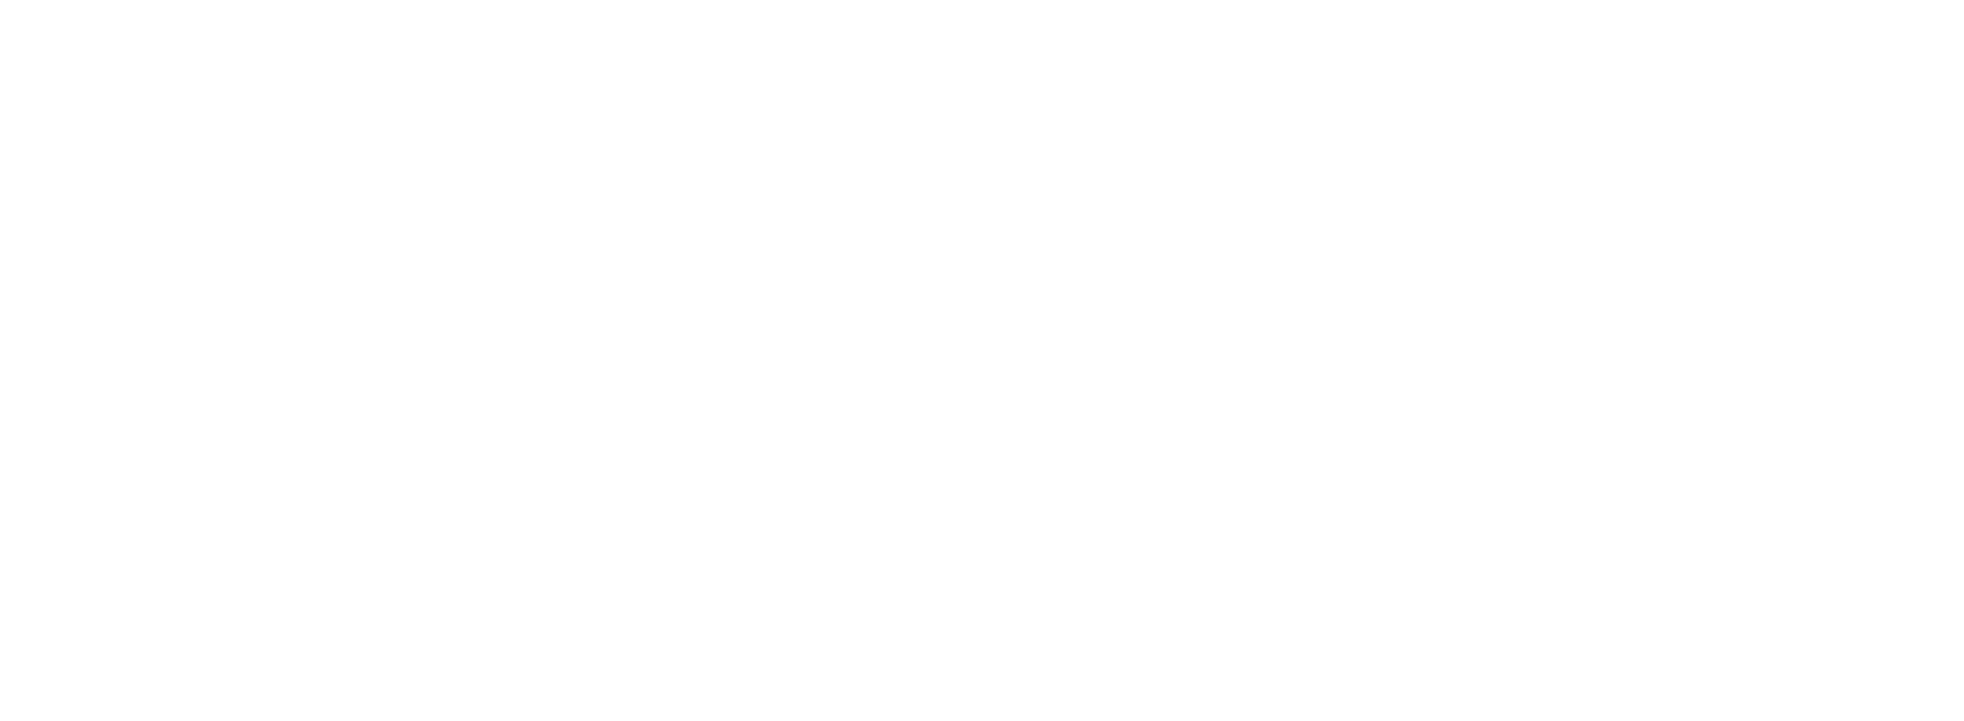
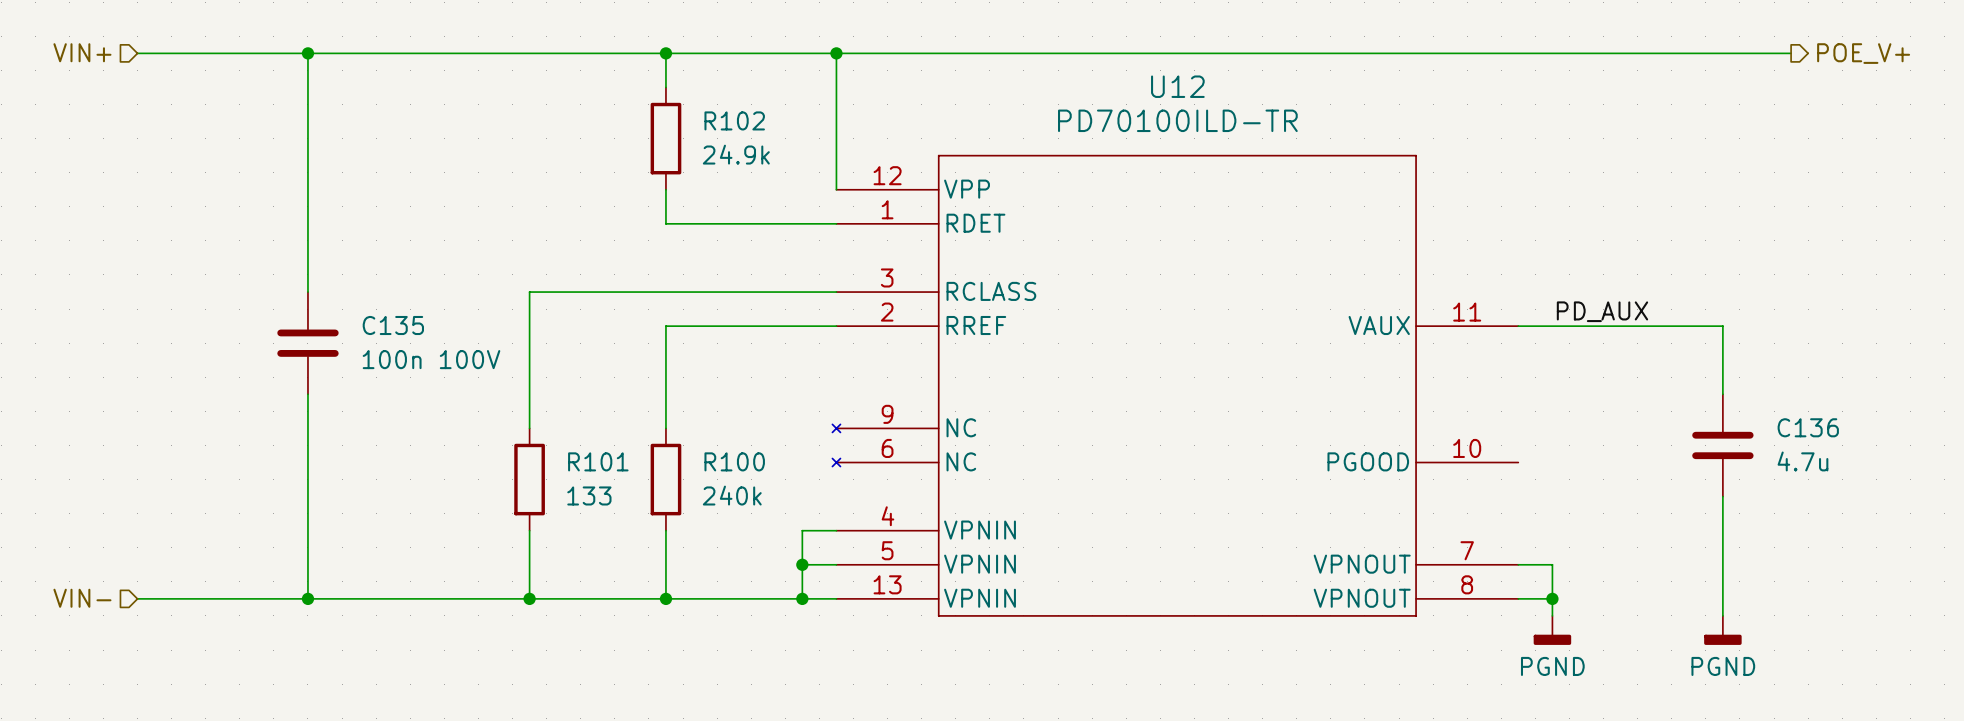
hierarchical label: none -> VIN+ (82, 52)
wire: none -> (137, 53) (1791, 53)
wire: none -> (307, 53) (307, 292)
junction: none -> (307, 53)
wire: none -> (665, 53) (665, 87)
junction: none -> (665, 53)
wire: none -> (836, 53) (836, 189)
junction: none -> (836, 53)
hierarchical label: none -> POE_V+ (1863, 53)
R102: none -> 24.9k (665, 138)
wire: none -> (665, 189) (665, 223) (836, 223)
wire: none -> (836, 292) (529, 292) (529, 428)
label: none -> PD_AUX (1602, 311)
wire: none -> (836, 326) (665, 326) (665, 428)
wire: none -> (1518, 326) (1722, 326) (1722, 394)
C135: none -> 100n 100V (307, 343)
U12: none -> PD70100ILD-TR (1175, 385)
wire: none -> (307, 394) (307, 598)
C136: none -> 4.7u (1722, 445)
R101: none -> 133 (529, 479)
R100: none -> 240k (665, 479)
wire: none -> (1722, 496) (1722, 615)
wire: none -> (529, 530) (529, 598)
wire: none -> (665, 530) (665, 598)
wire: none -> (836, 530) (802, 530) (802, 598)
wire: none -> (802, 564) (836, 564)
junction: none -> (802, 564)
wire: none -> (1518, 564) (1552, 564) (1552, 615)
hierarchical label: none -> VIN- (82, 598)
wire: none -> (137, 598) (836, 598)
junction: none -> (307, 598)
junction: none -> (529, 598)
junction: none -> (665, 598)
junction: none -> (802, 598)
wire: none -> (1518, 598) (1552, 598)
junction: none -> (1552, 598)
power symbol: none -> PGND (1552, 630)
power symbol: none -> PGND (1722, 630)

